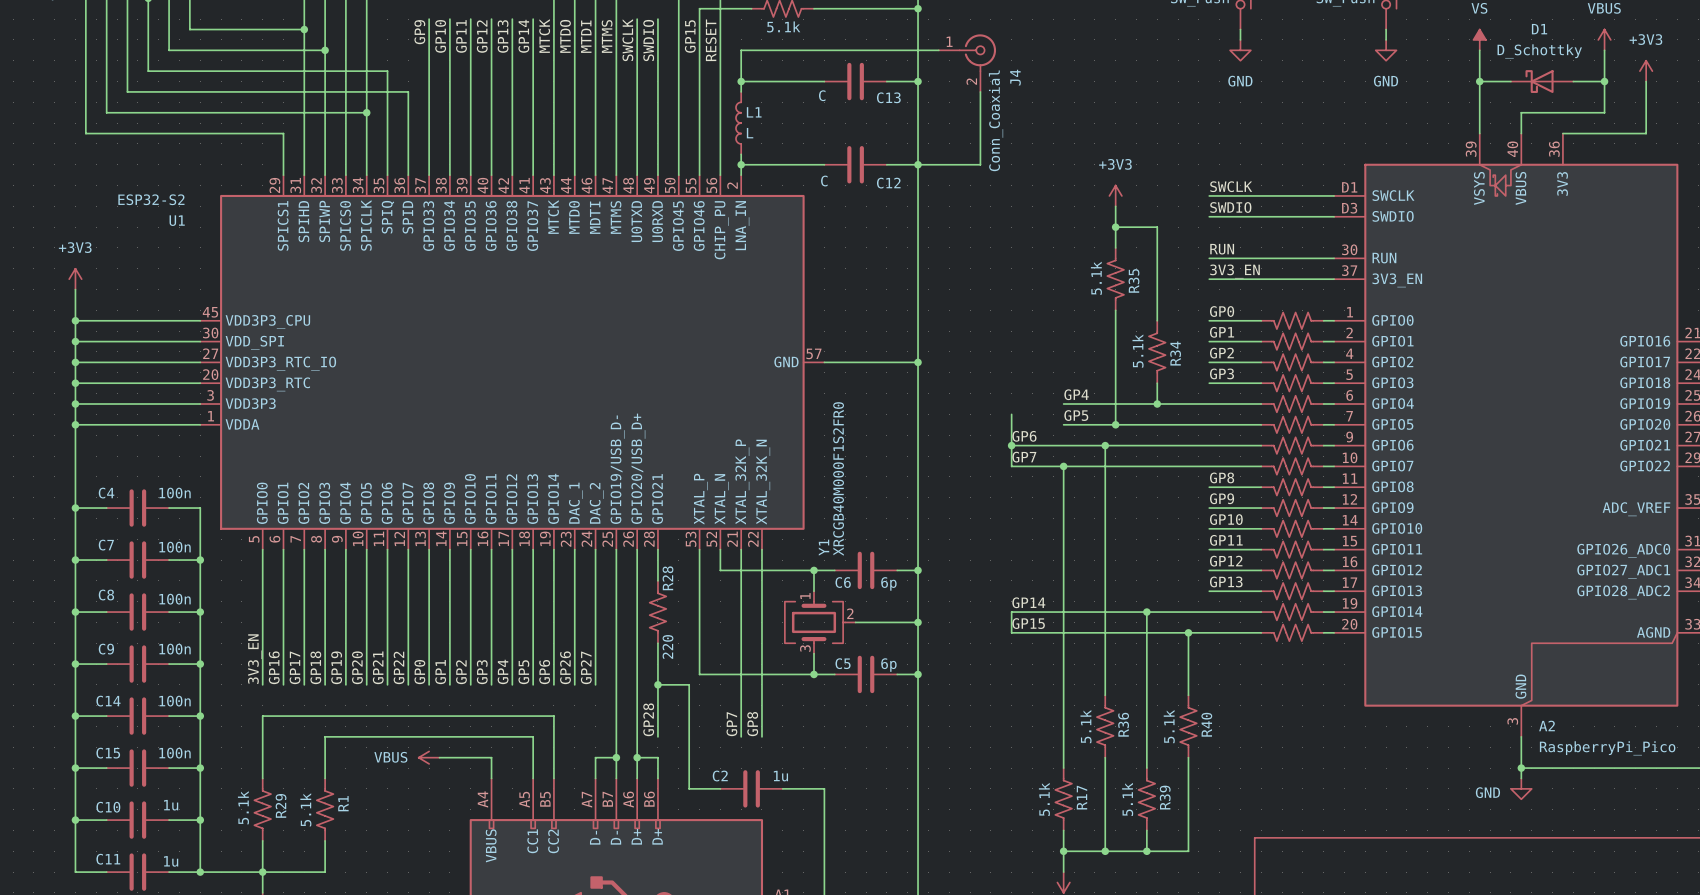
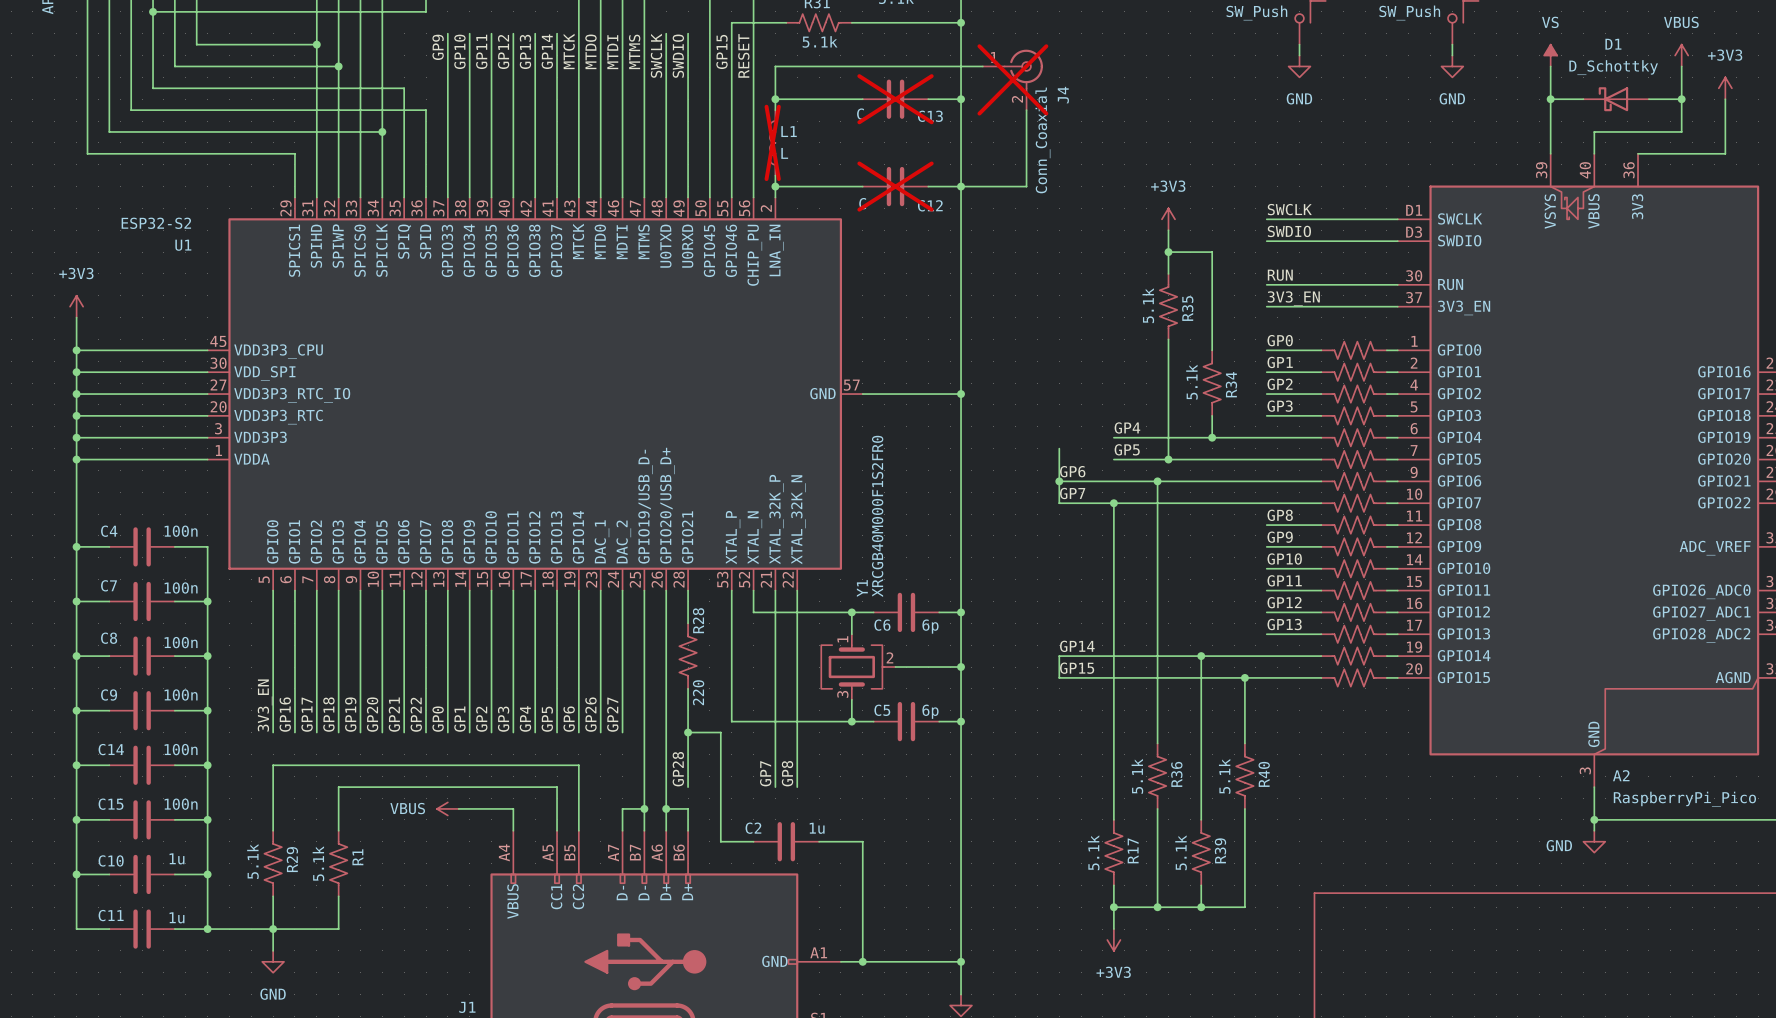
J4 do-not-place cross: none -> (1012, 79)
C13 do-not-place cross: none -> (895, 99)
L1 do-not-place cross: none -> (772, 142)
C12 do-not-place cross: none -> (895, 186)

